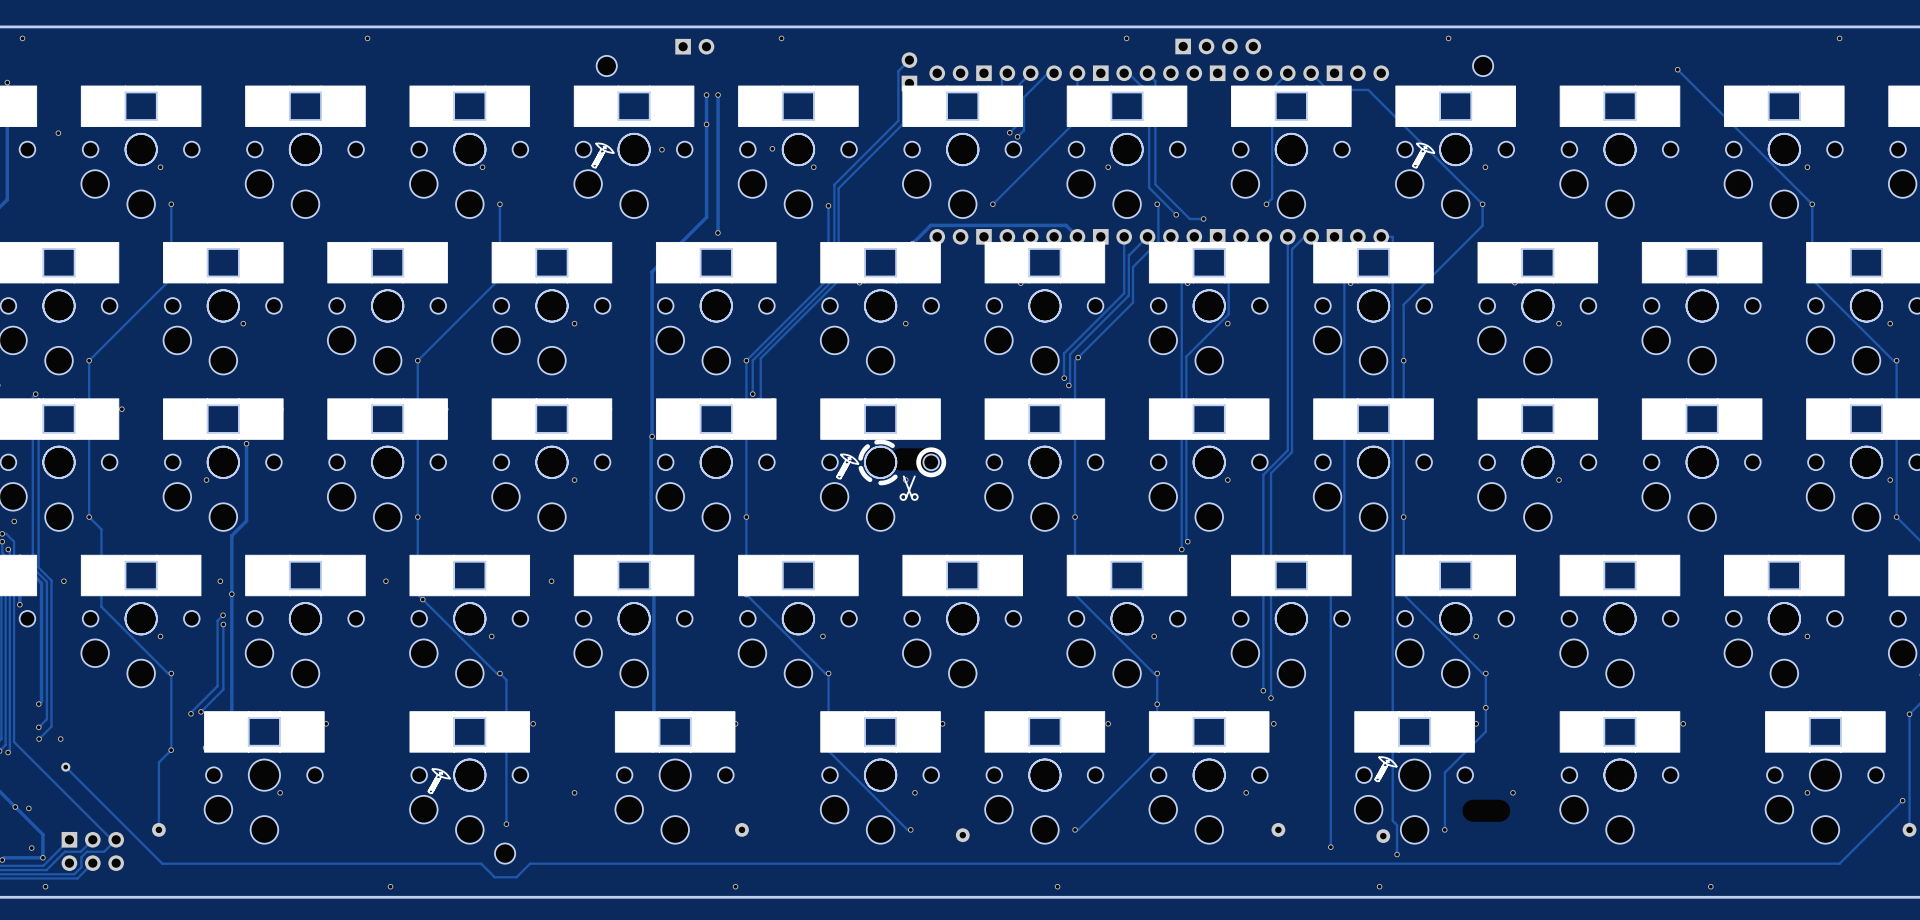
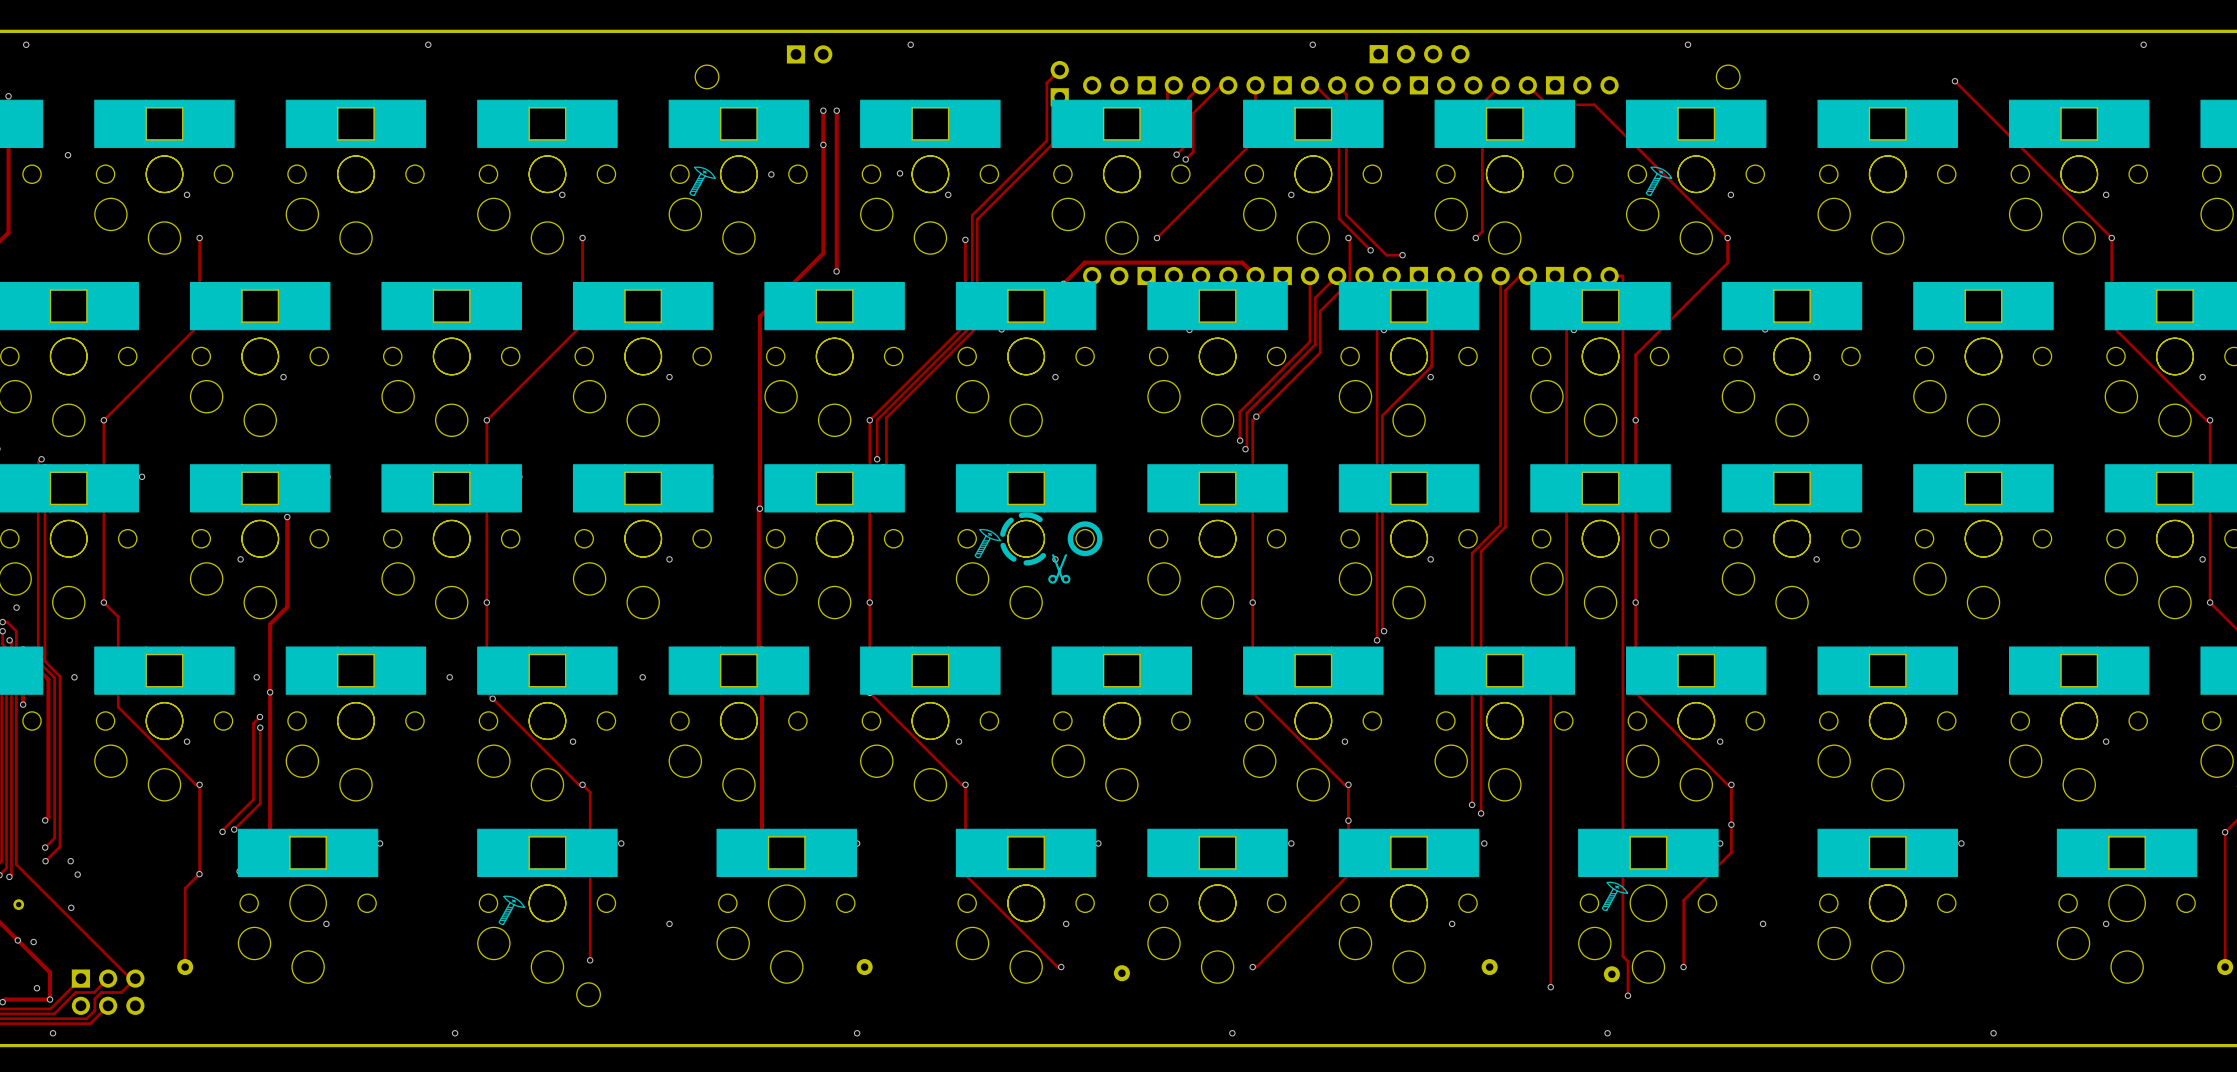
via: none -> (77, 874)
track: (65, 767) (162, 863) (481, 863) (494, 877) (516, 877) (530, 863) (1839, 863) (1902, 800) -> none
part position: (65, 767) -> (18, 904)
via: none -> (71, 907)
via: (1902, 800) -> none

